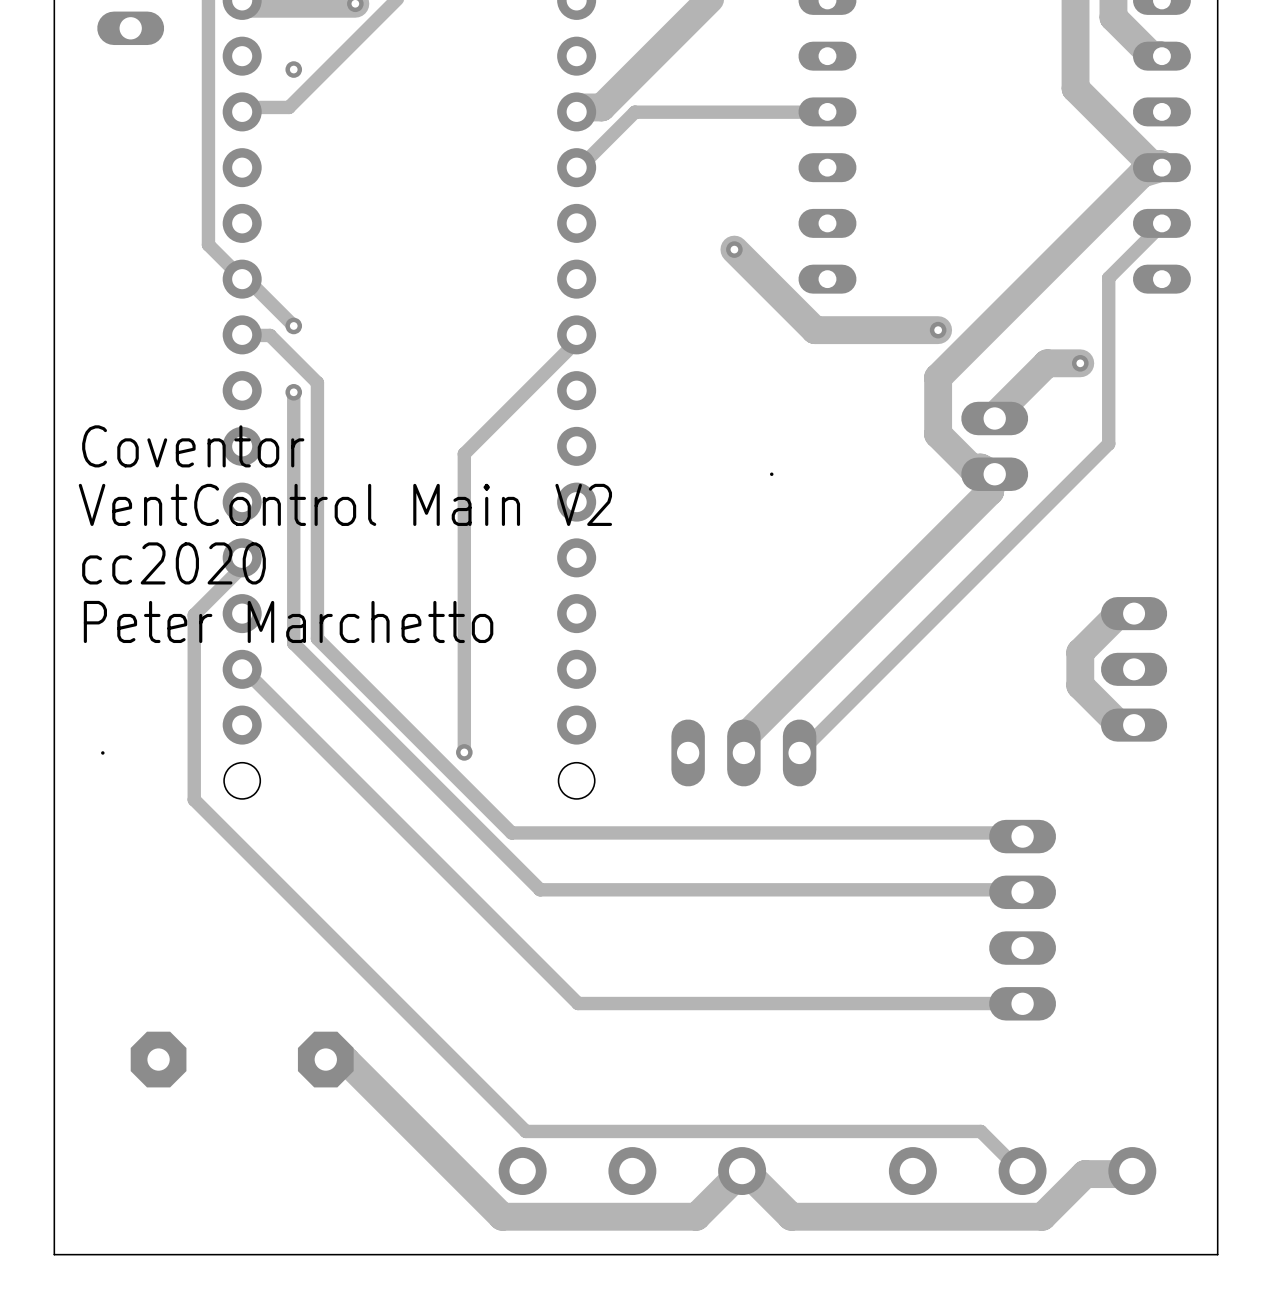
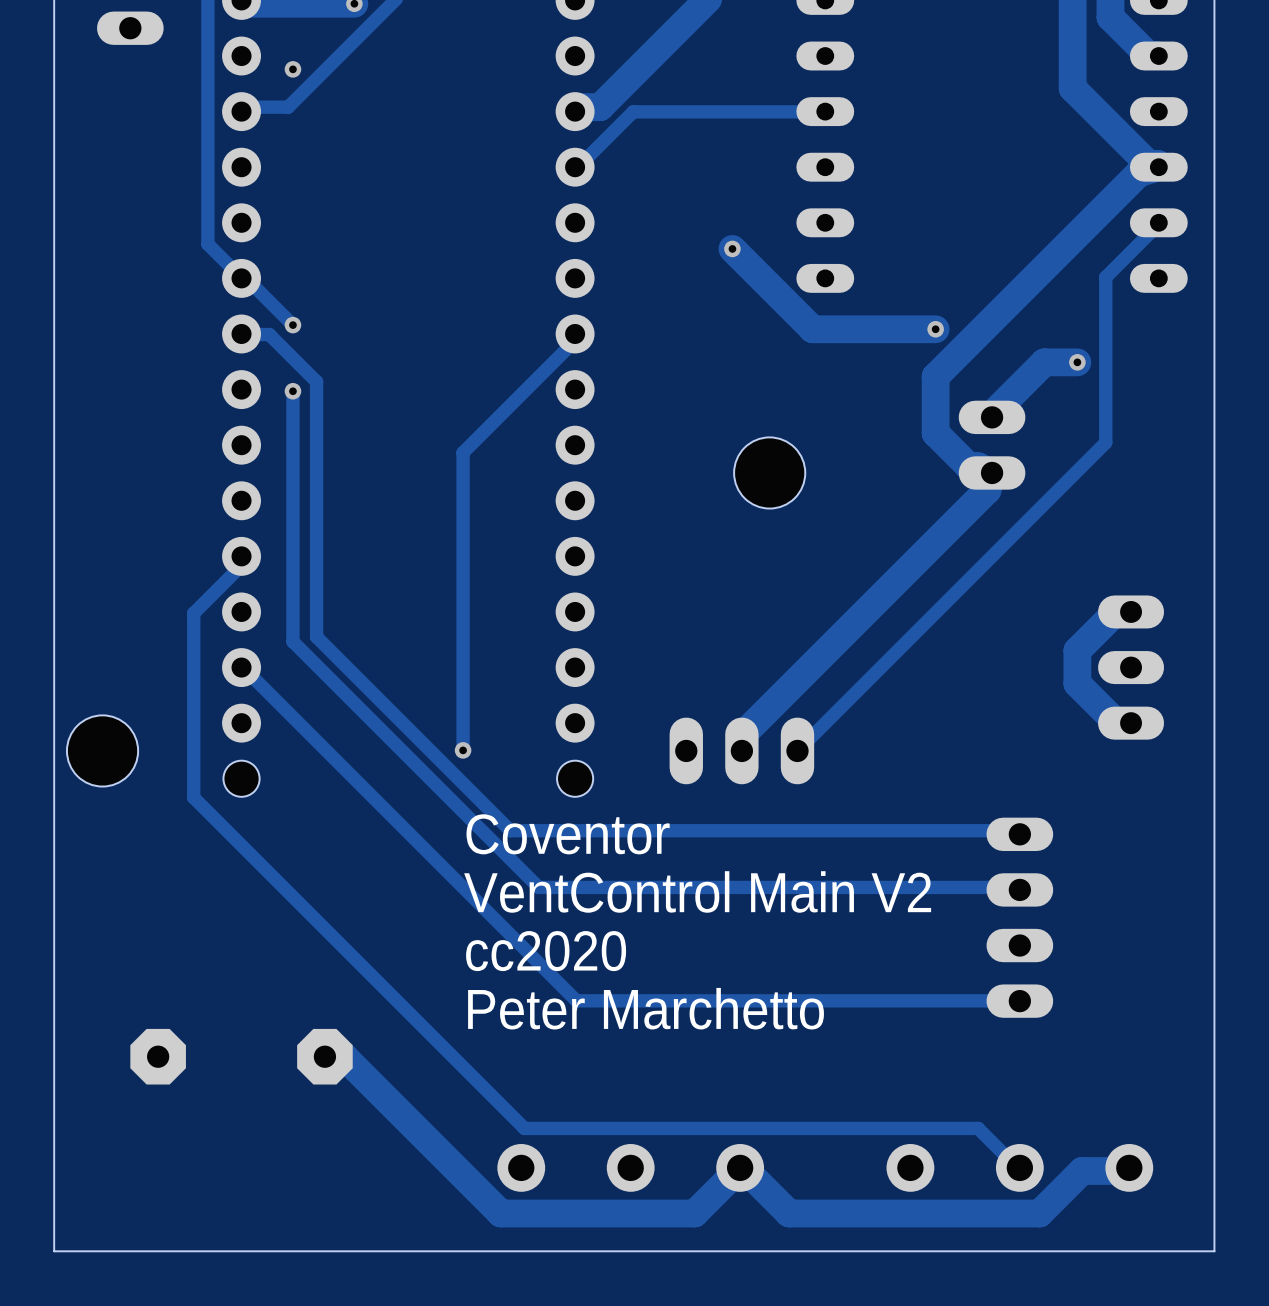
text: Coventor (193, 446) -> none
hole size: [770, 473, 773, 476] -> [734, 437, 806, 509]
text: VentControl Main V2 (345, 504) -> none
text: cc2020 (174, 563) -> none
text: Peter Marchetto (288, 621) -> none
hole size: [101, 752, 104, 754] -> [66, 715, 139, 787]
text: none -> Coventor (568, 834)
text: none -> VentControl Main V2 (697, 891)
text: none -> cc2020 (546, 951)
text: none -> Peter Marchetto (646, 1008)

